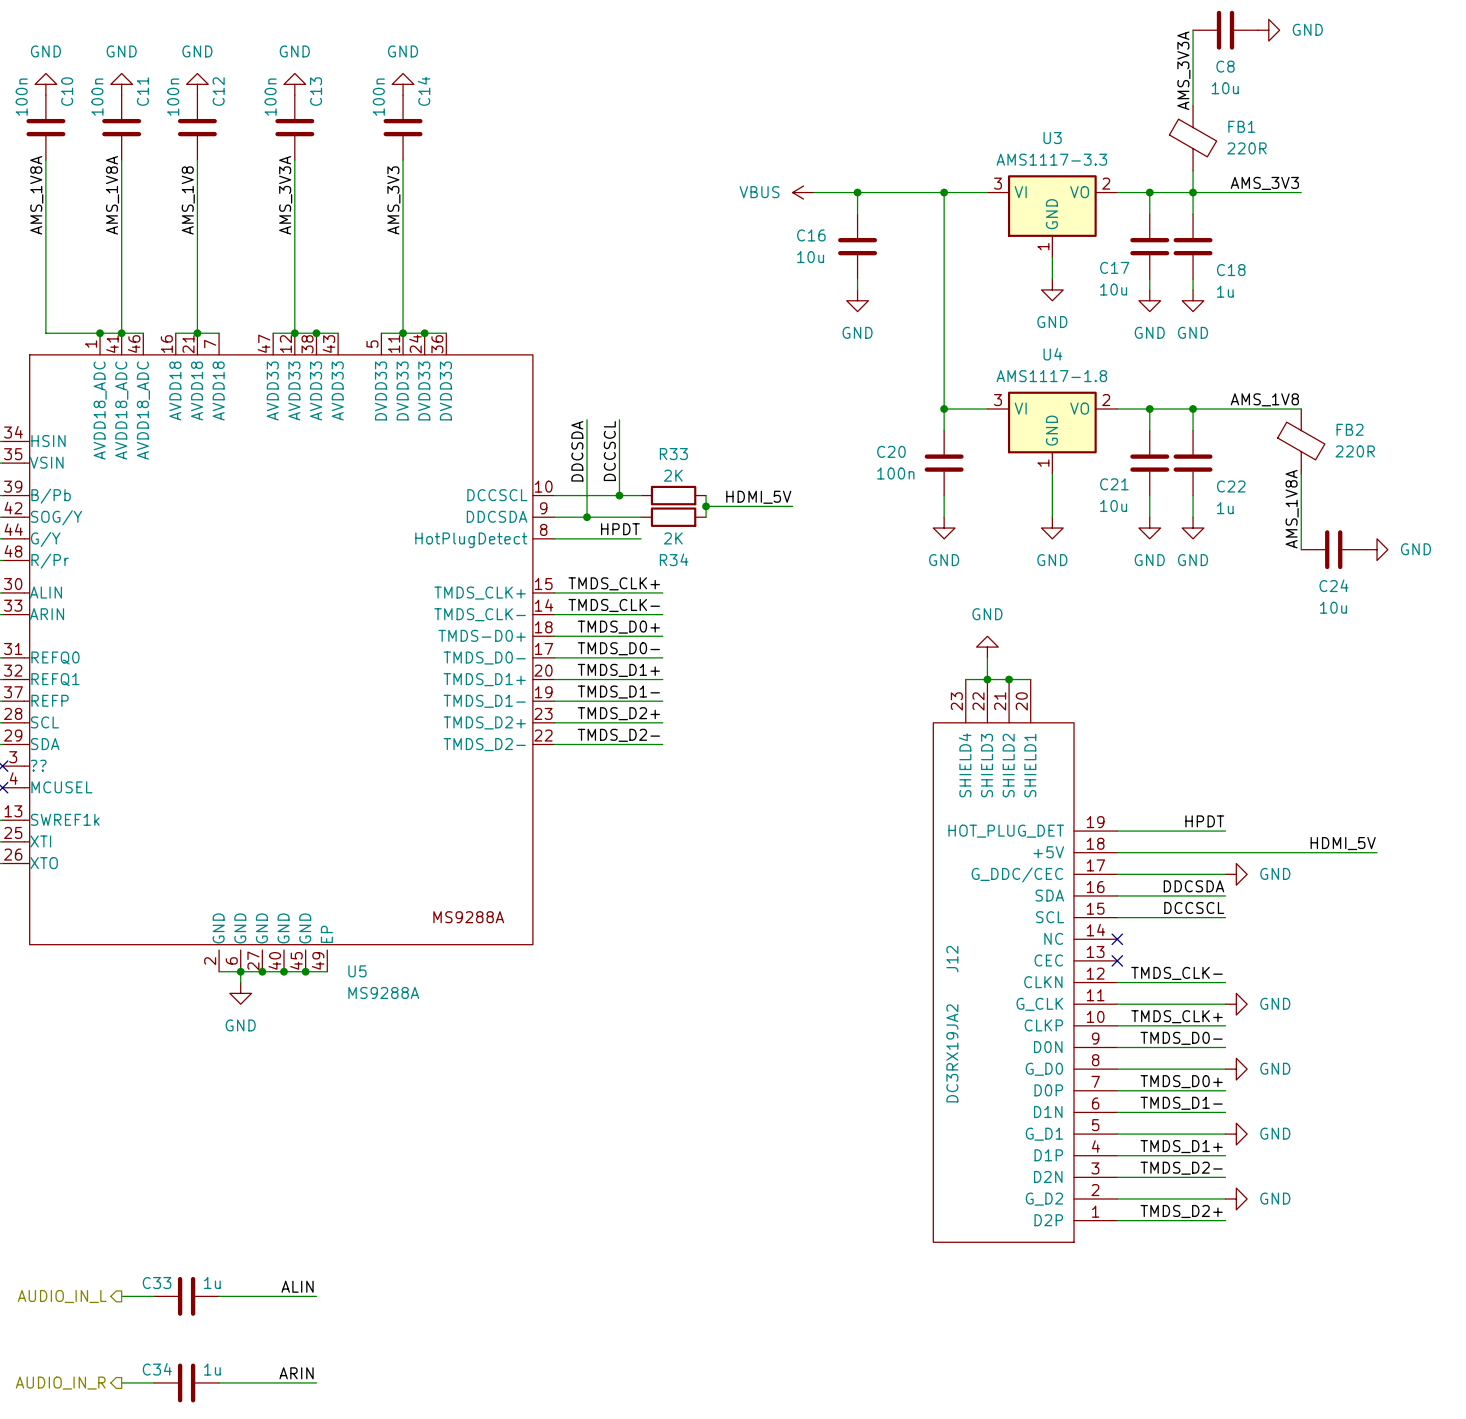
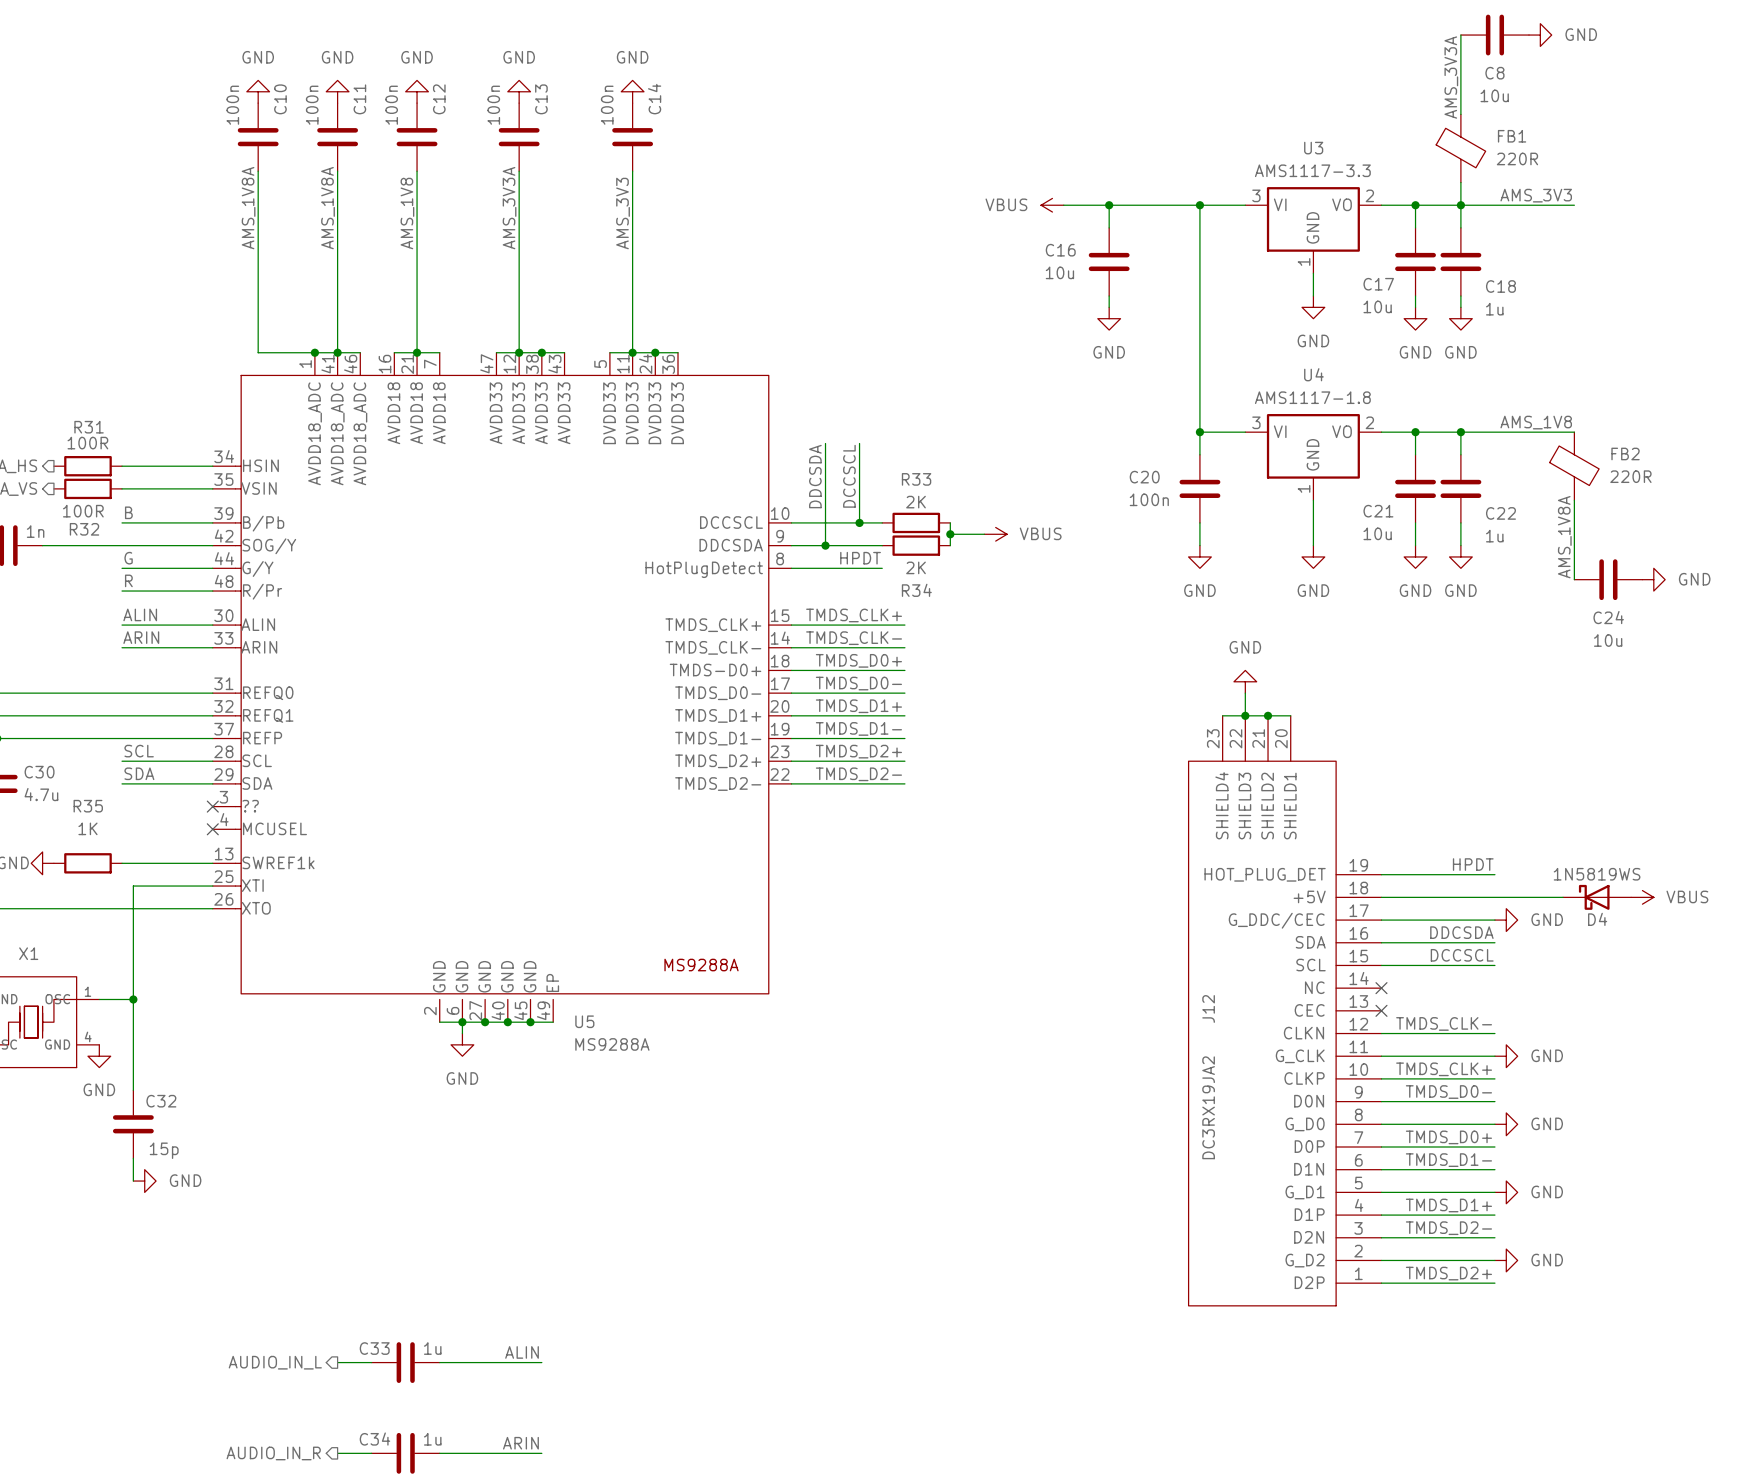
label: HDMI_5V (758, 497) -> none
power symbol: none -> VBUS (995, 534)
label: HDMI_5V (1343, 843) -> none
D4: none -> 1N5819WS (1597, 897)
power symbol: none -> VBUS (1642, 897)

